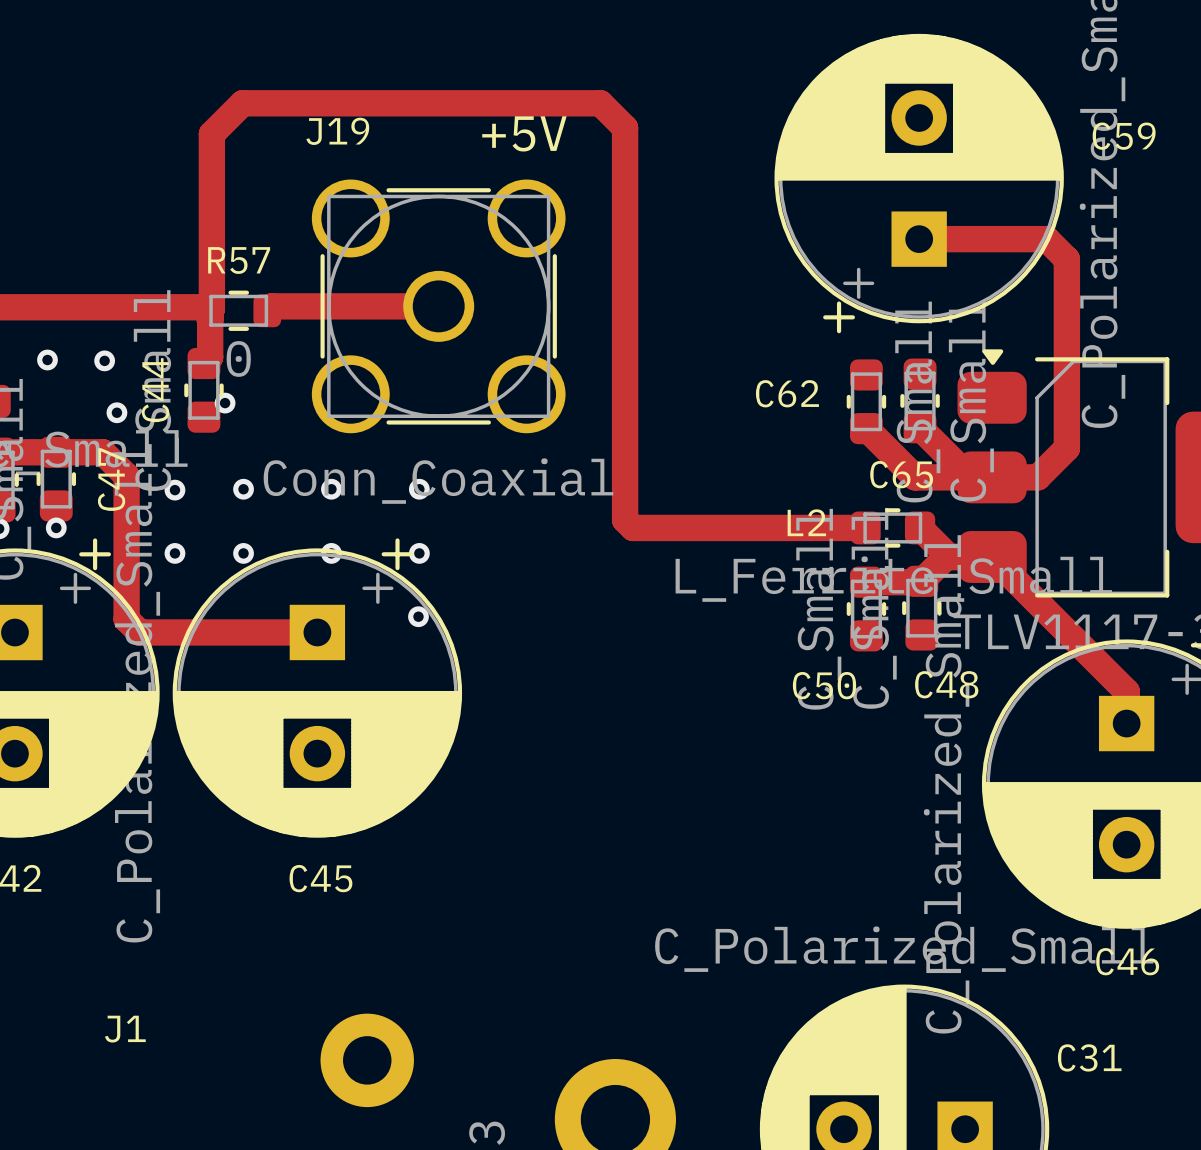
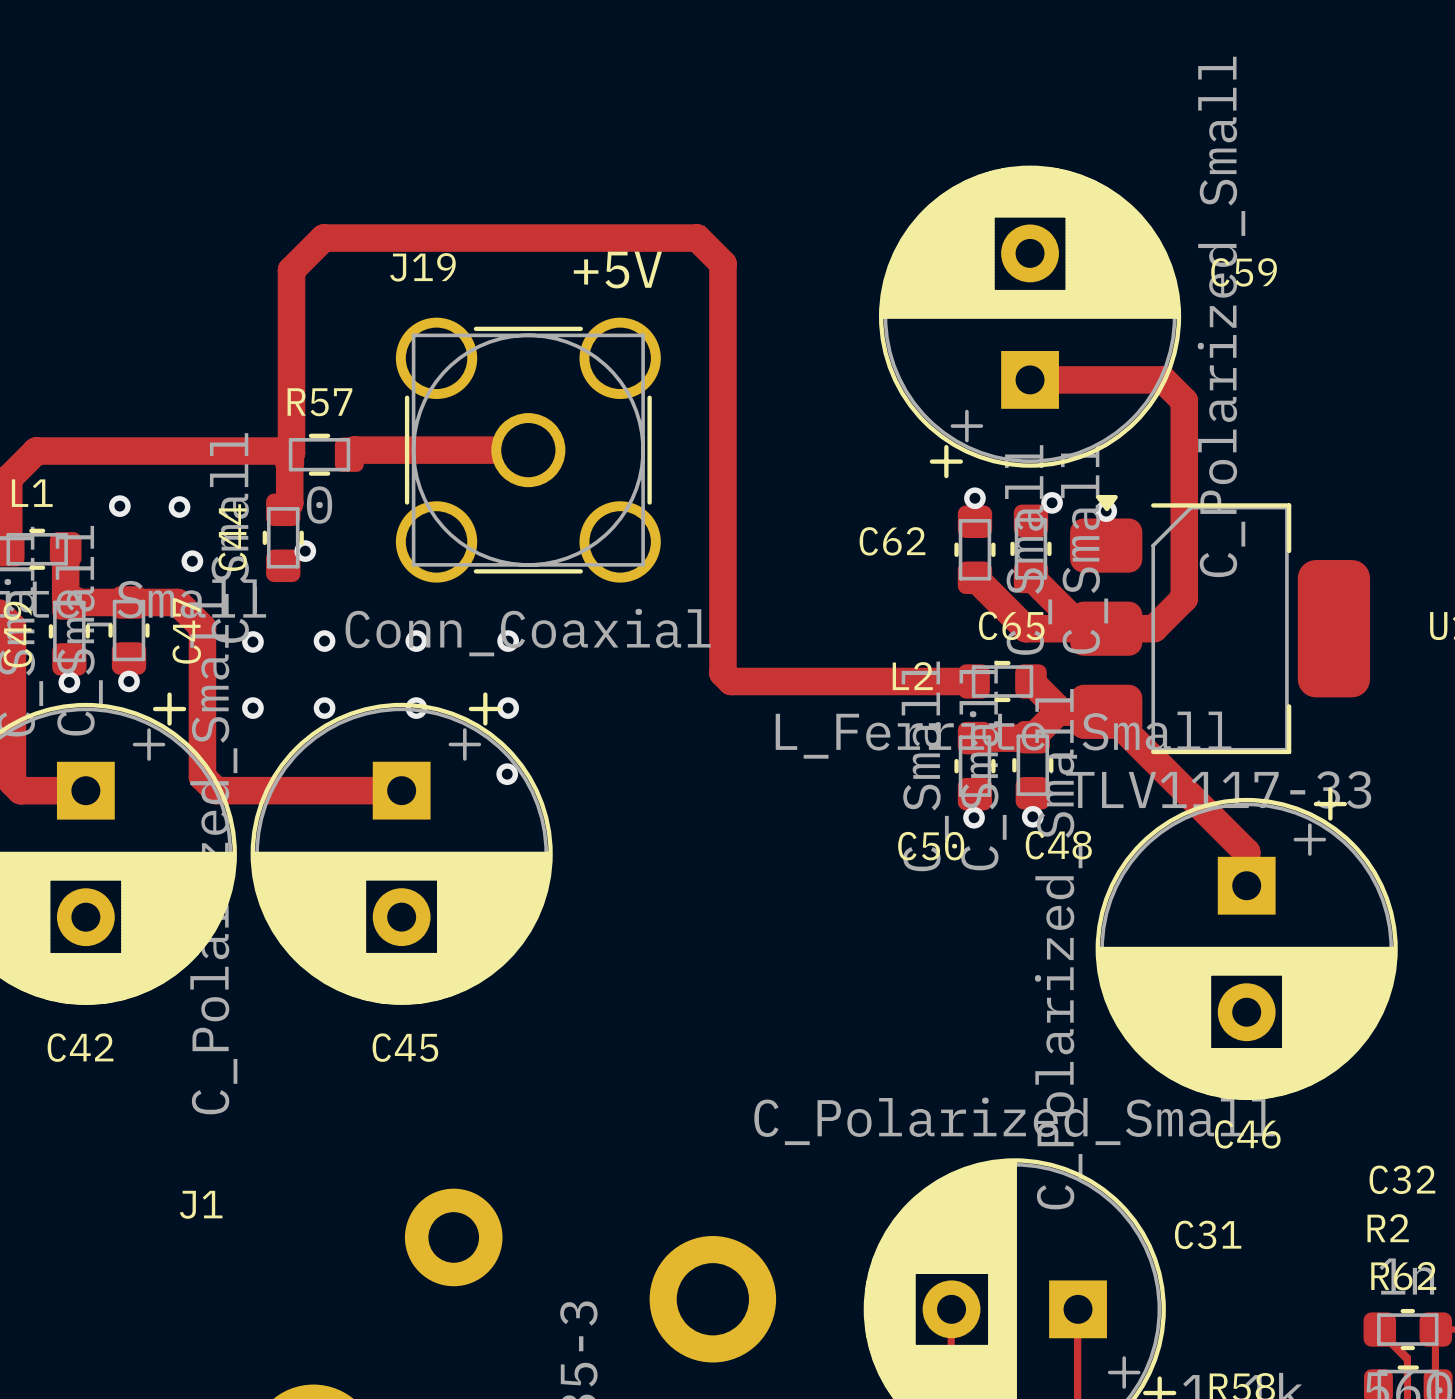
via: none -> (974, 498)
via: none -> (1052, 502)
via: none -> (1106, 511)
via: none -> (1032, 816)
via: none -> (974, 817)

